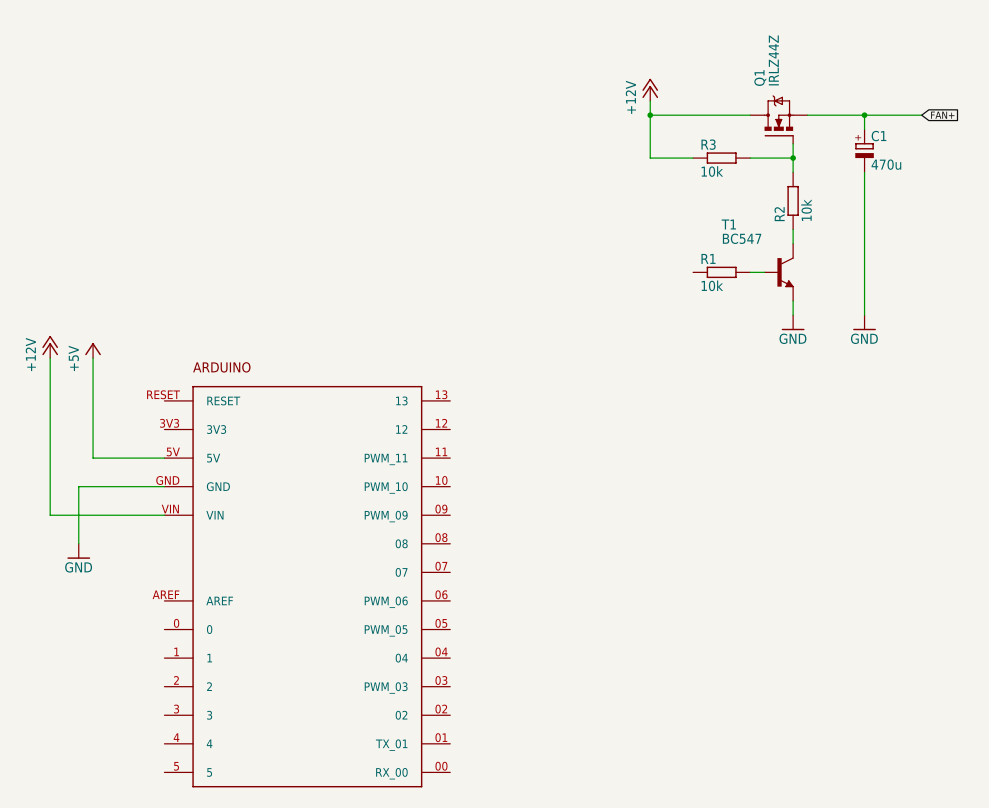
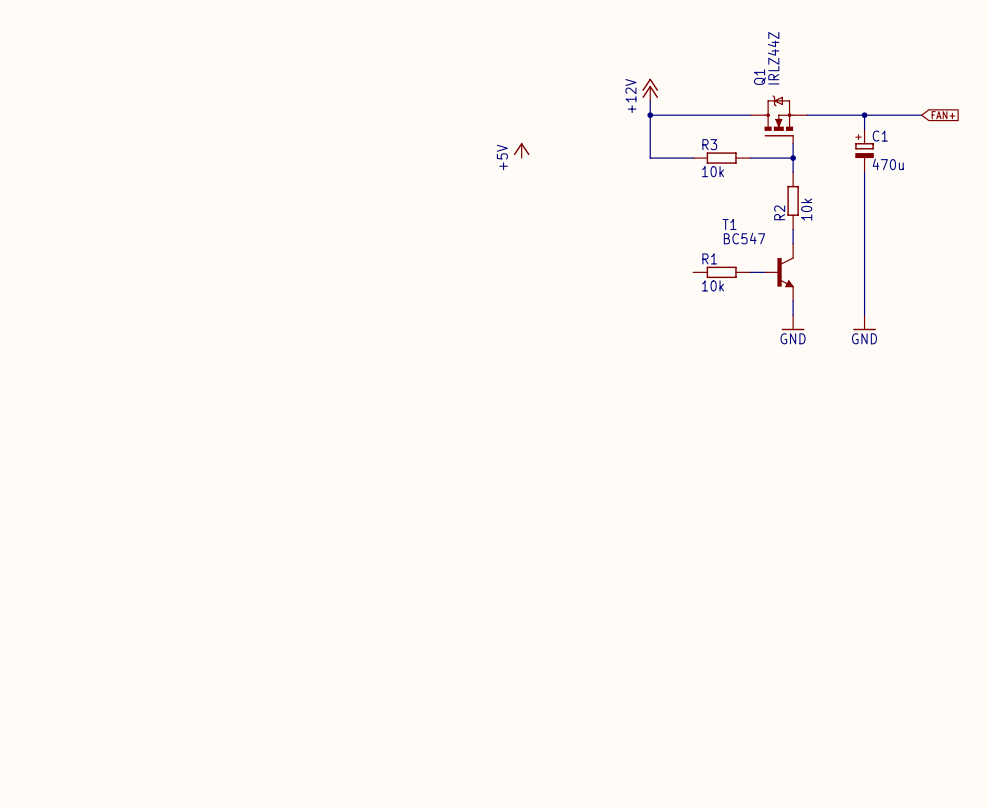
power symbol: none -> +5V (521, 150)
power symbol: +12V (50, 347) -> none
power symbol: +5V (93, 350) -> none
wire: (50, 358) (50, 515) (164, 515) -> none
wire: (93, 358) (93, 458) (164, 458) -> none
wire: (164, 486) (78, 486) (78, 543) -> none
power symbol: GND (78, 551) -> none
part: (307, 586) -> none

